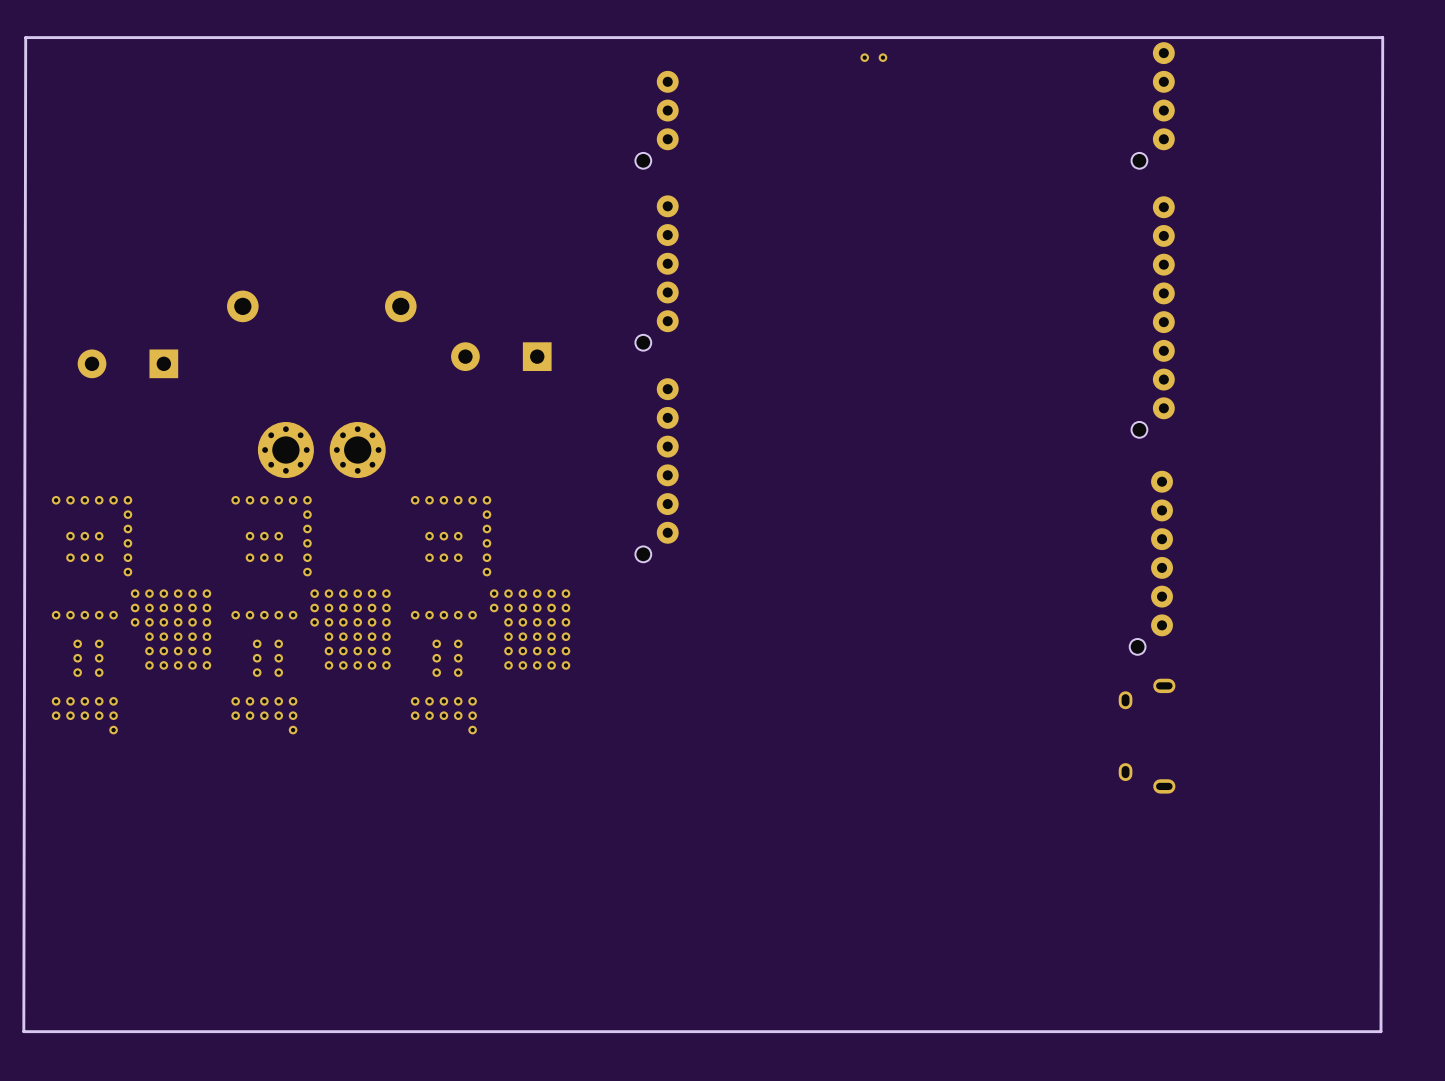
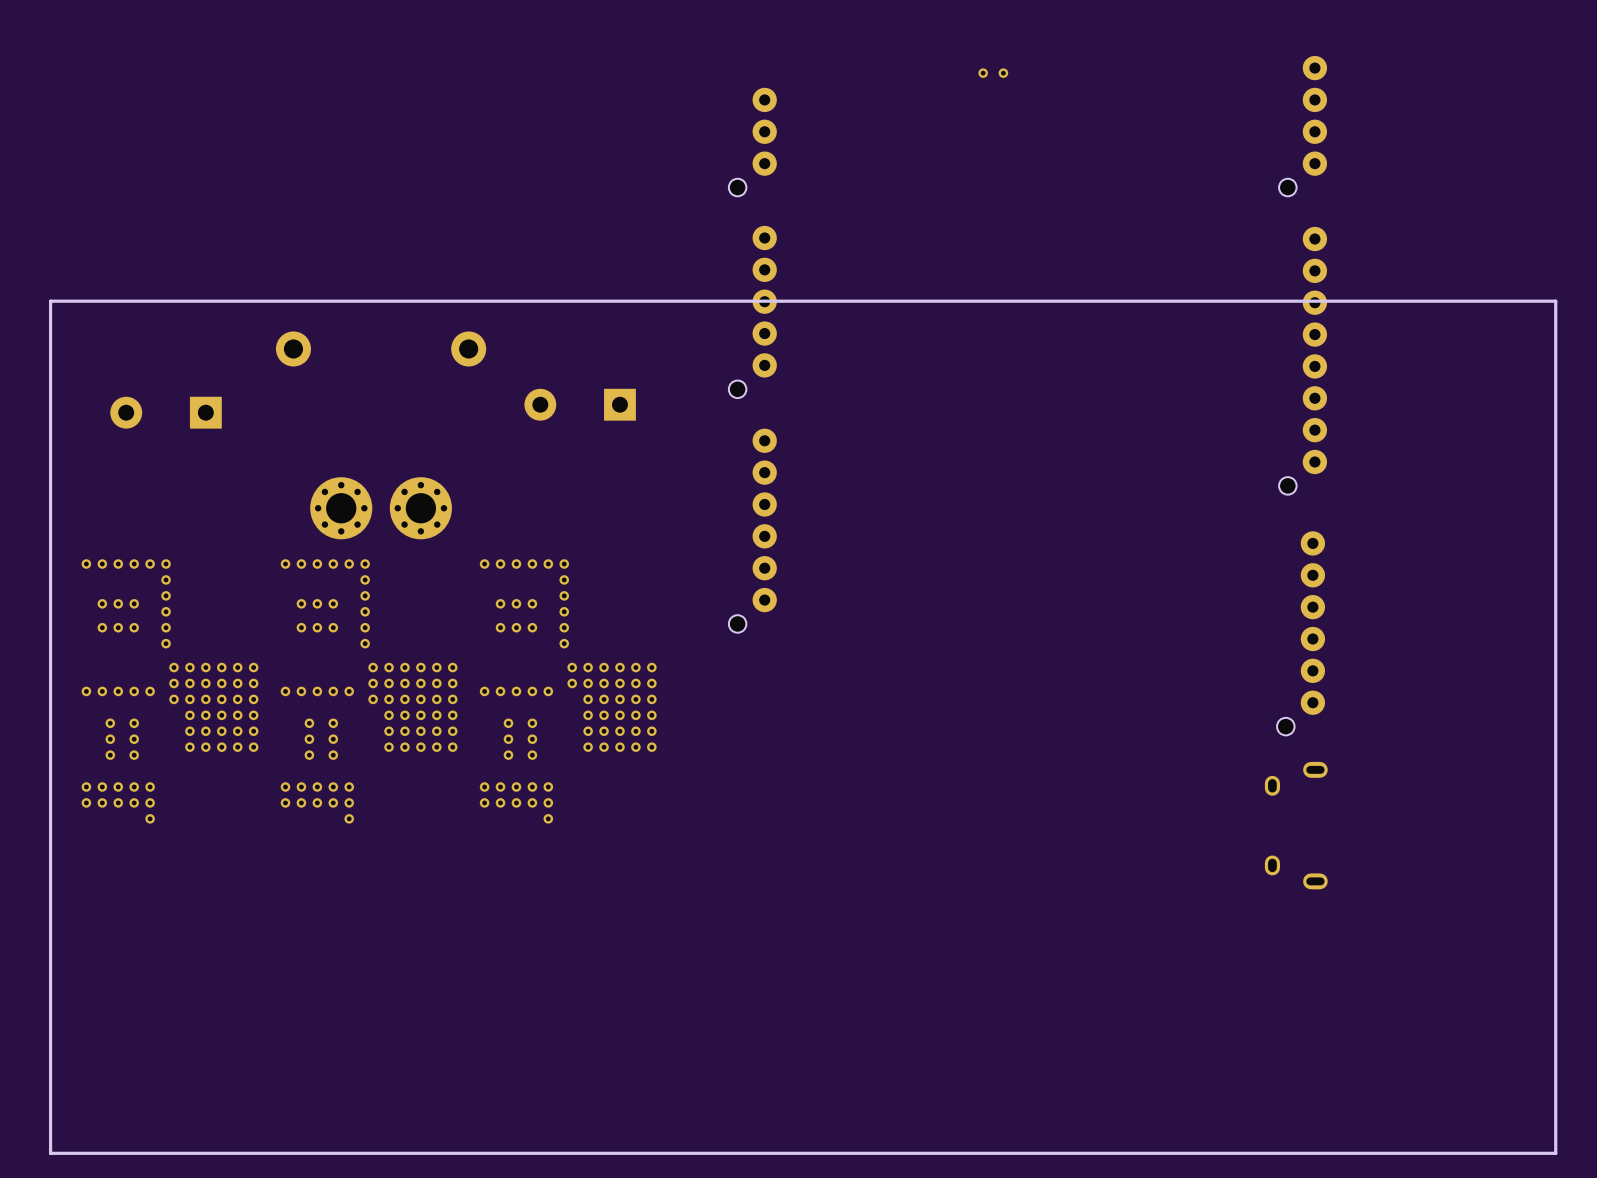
board edge: (1380, 1031) (1382, 37) (25, 37) (23, 1031) -> (1555, 1153) (1555, 301) (50, 301) (50, 1153)

